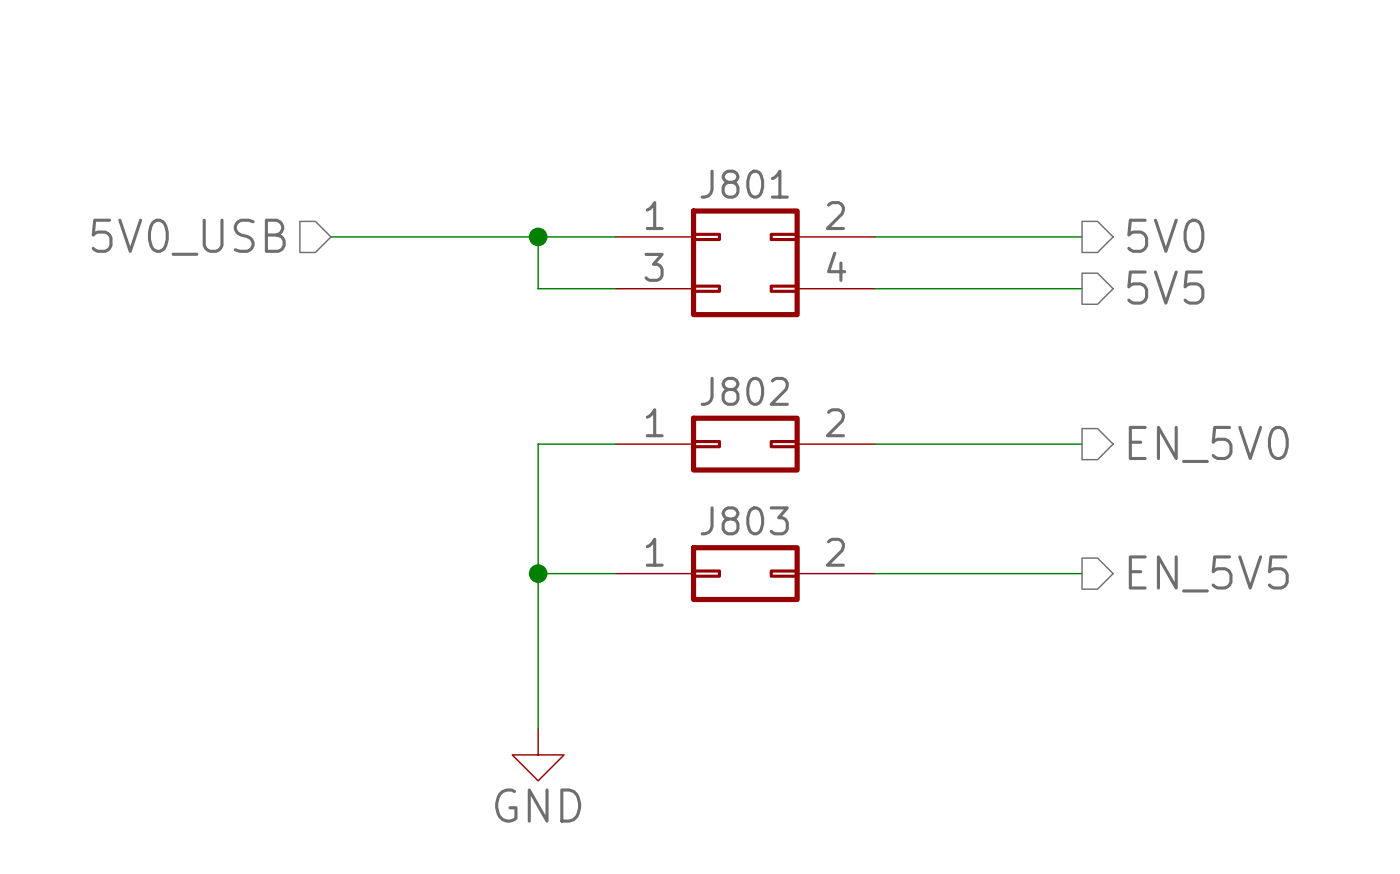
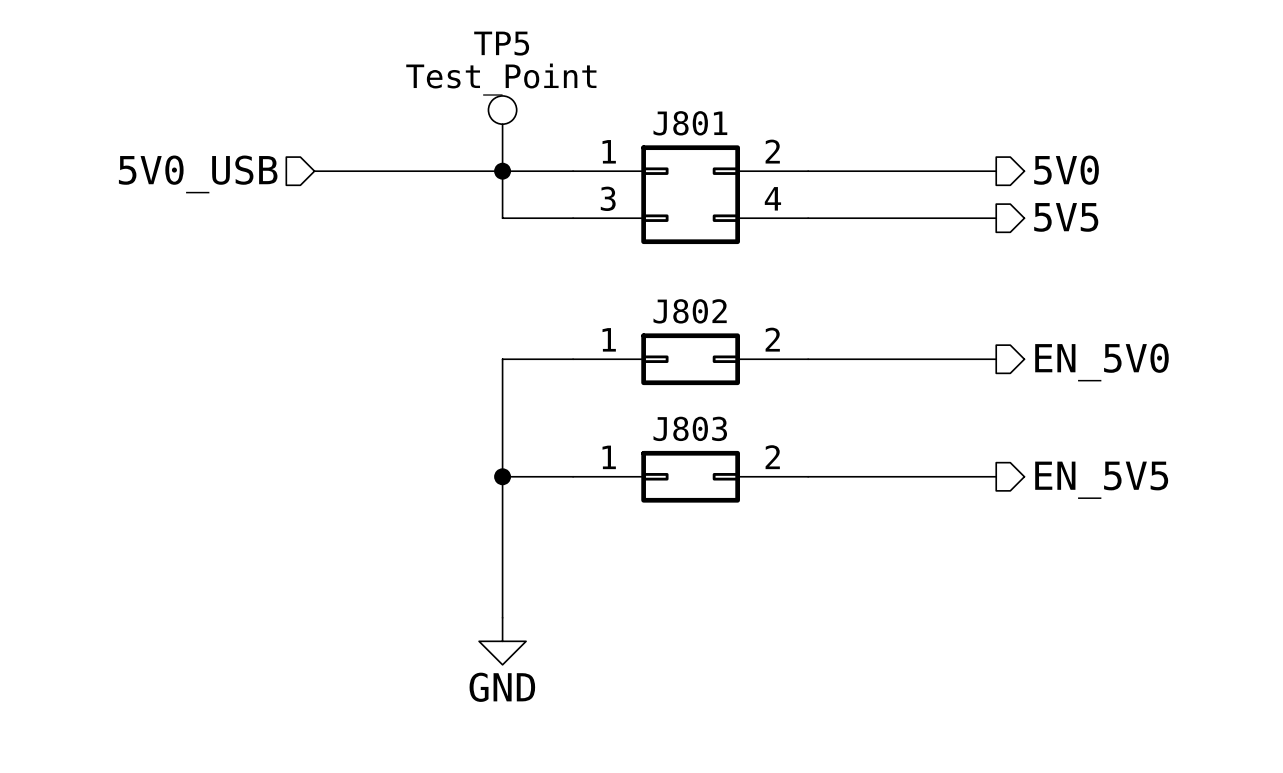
TP5: none -> Test_Point (502, 133)

